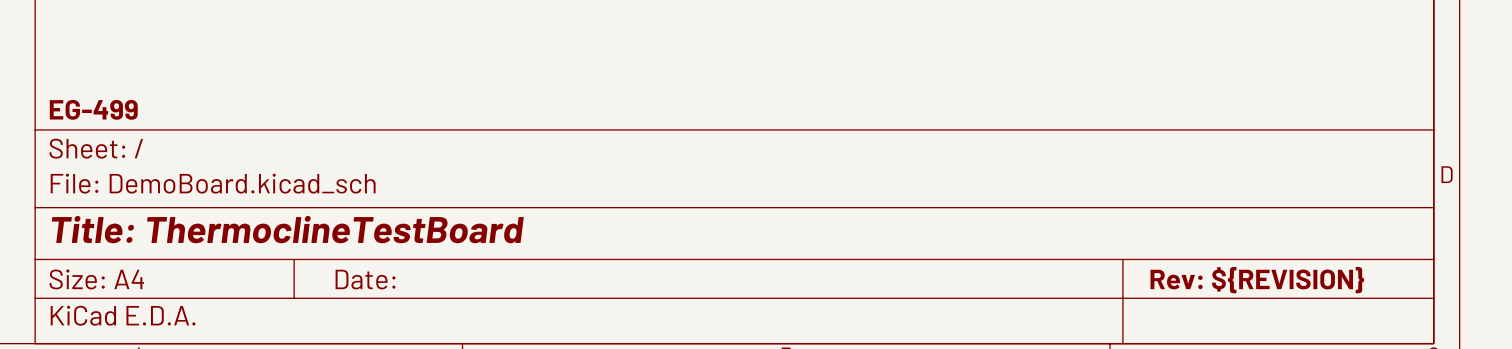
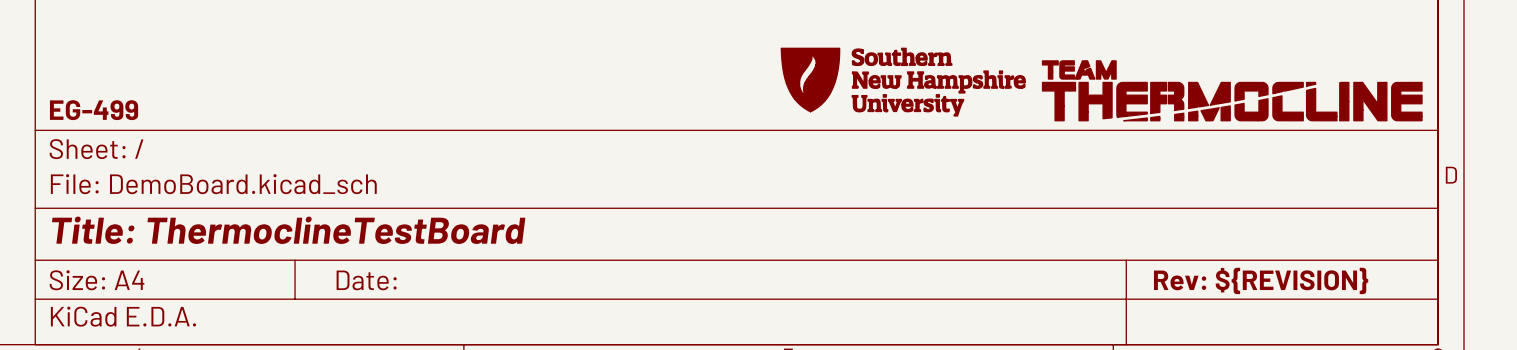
power symbol: none -> (903, 82)
power symbol: none -> (1232, 90)

